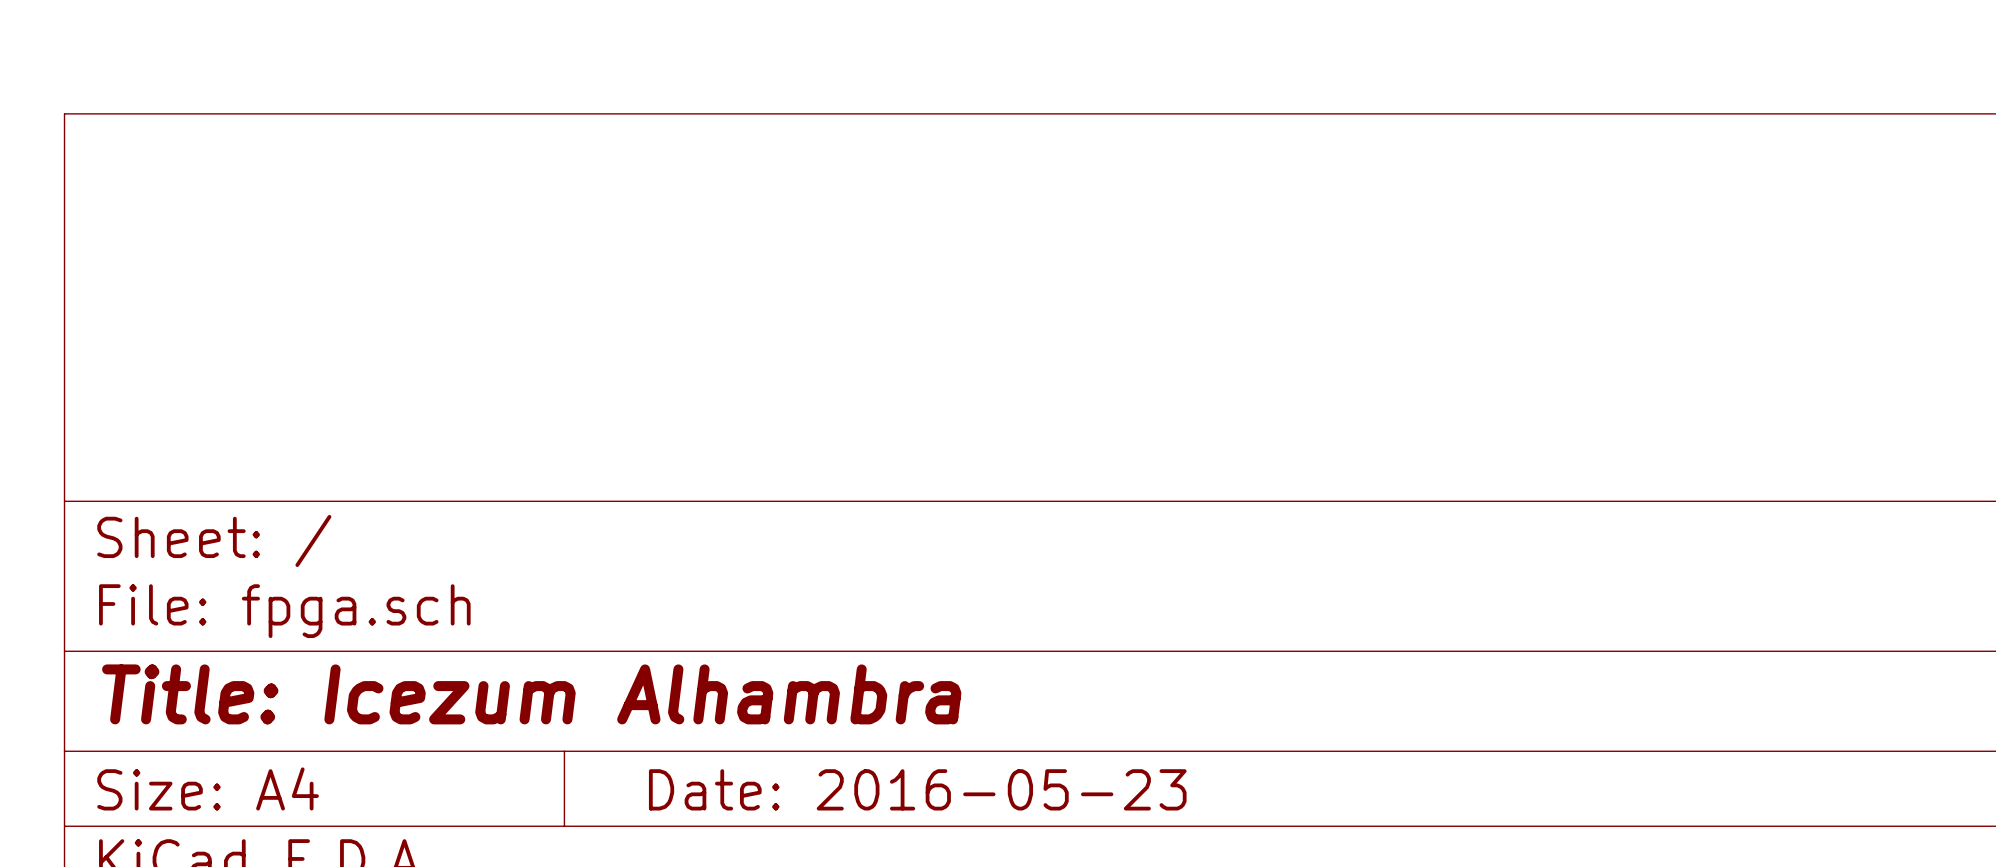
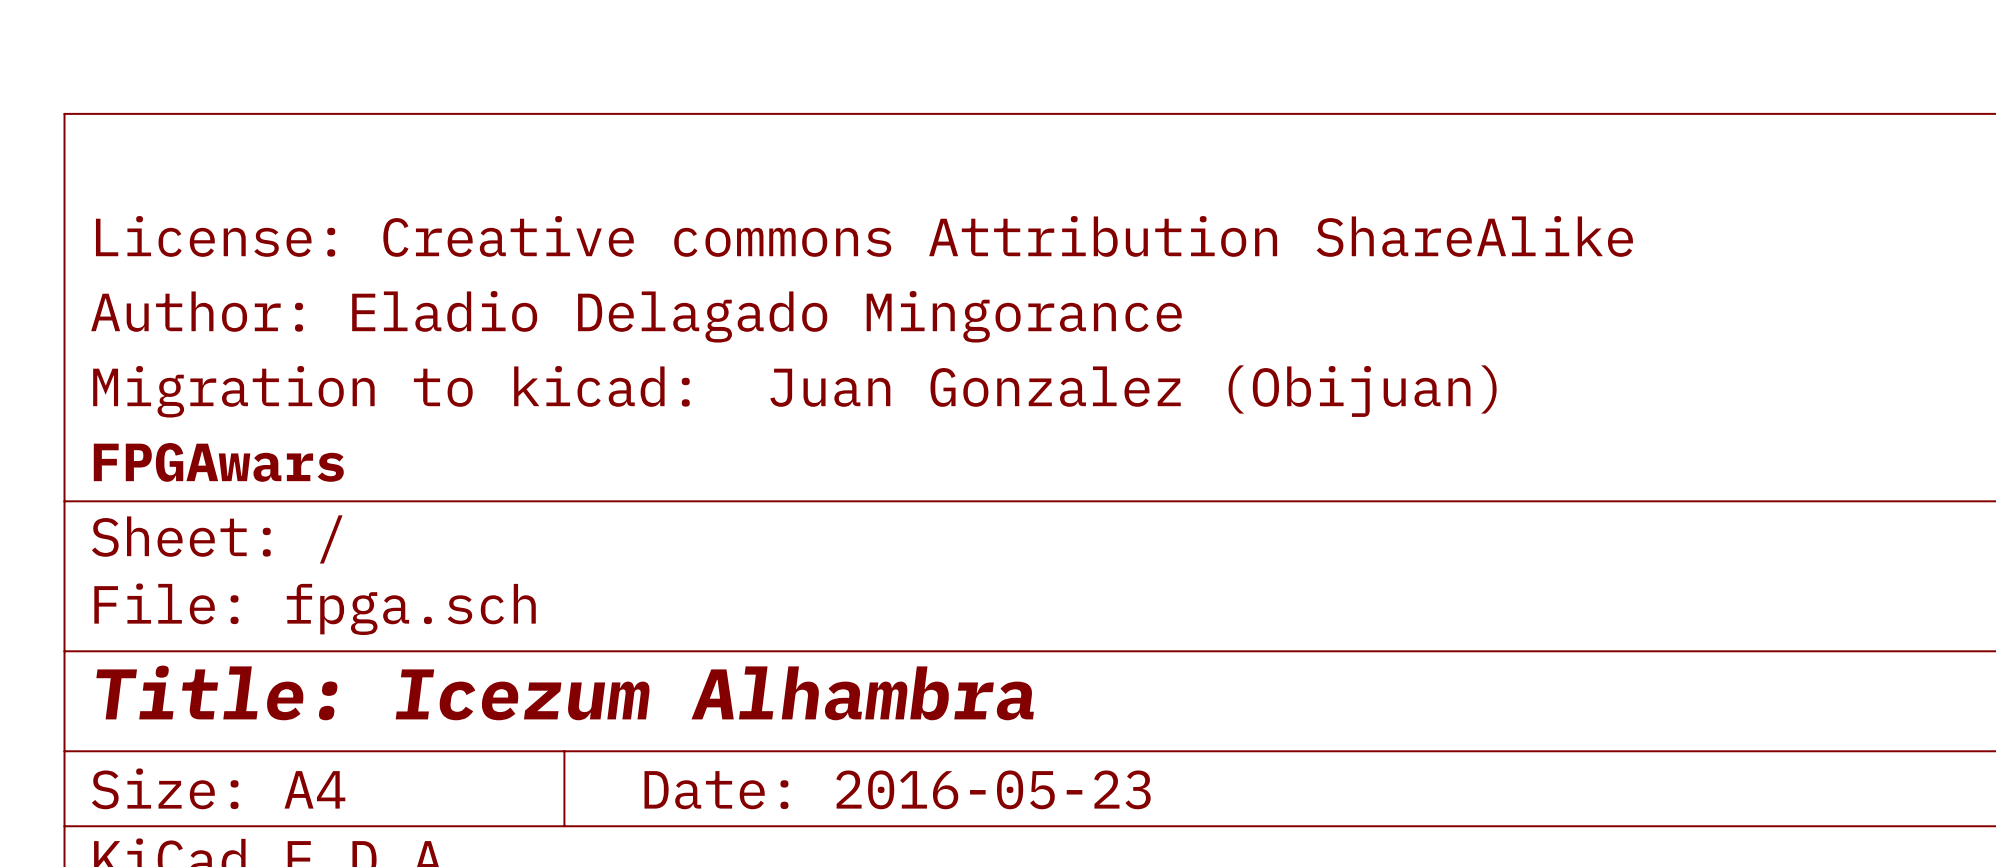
title block: none -> License: Creative commons Attribution ShareAlike (864, 236)
title block: none -> Author: Eladio Delagado Mingorance (636, 316)
title block: none -> Migration to kicad: Juan Gonzalez (Obijuan) (794, 391)
title block: none -> FPGAwars (218, 462)

